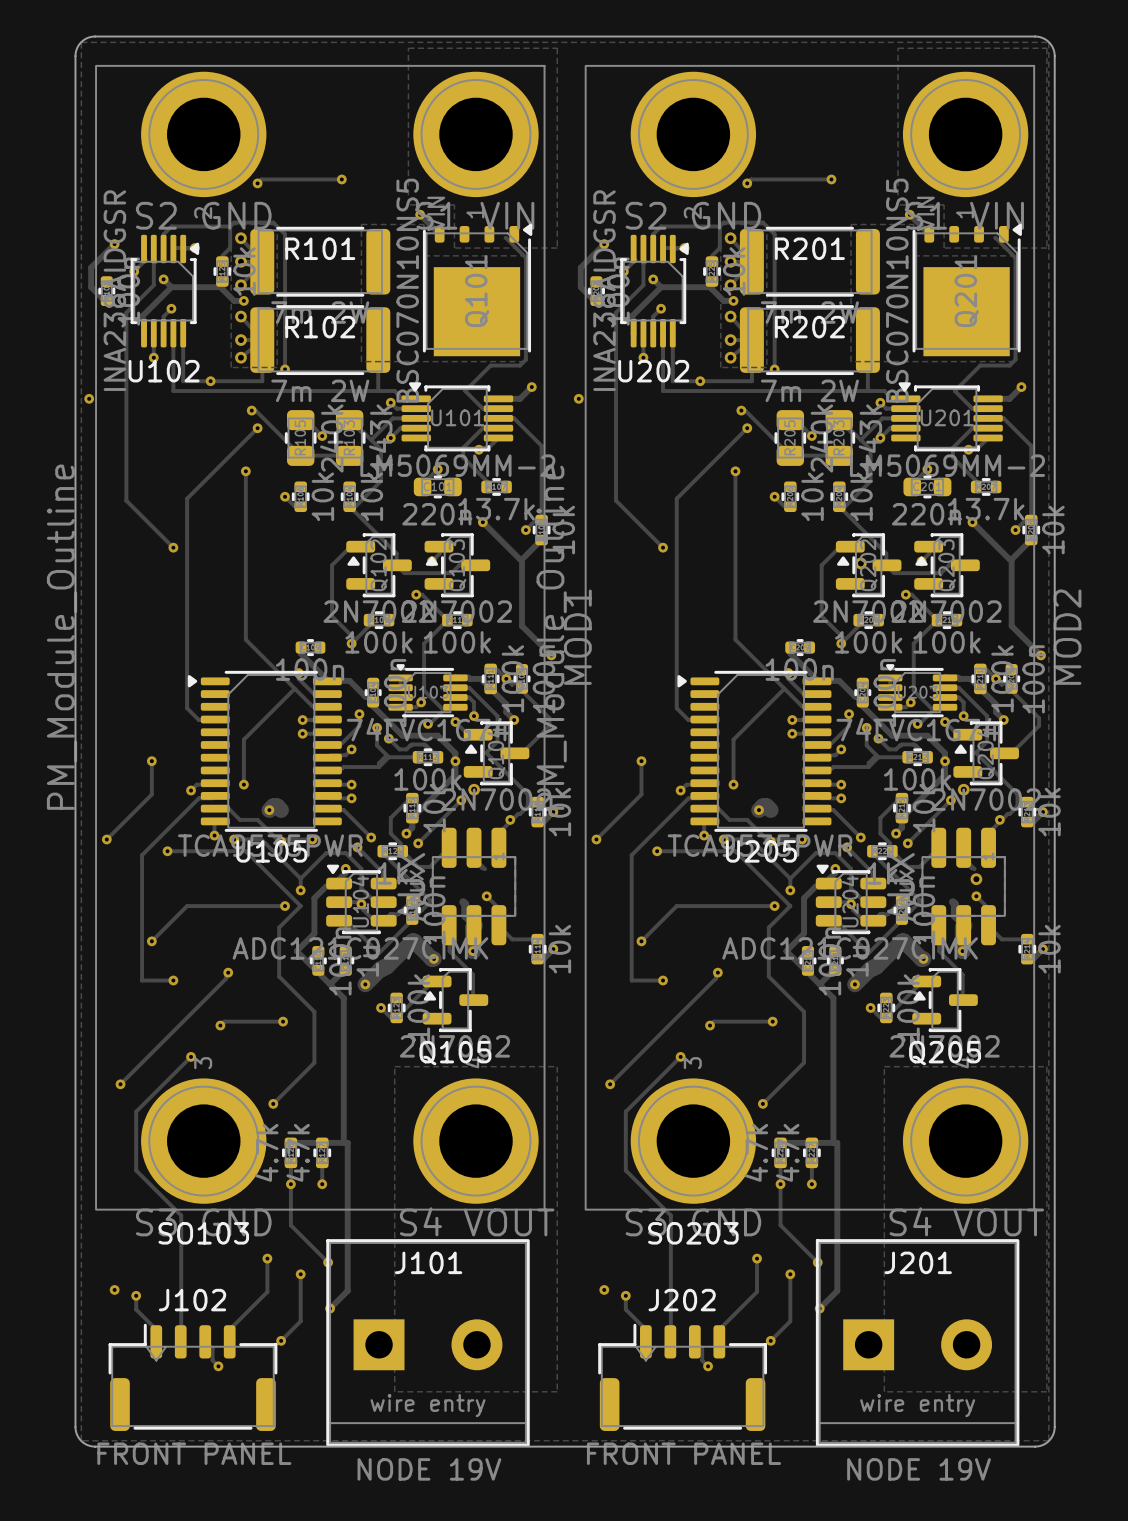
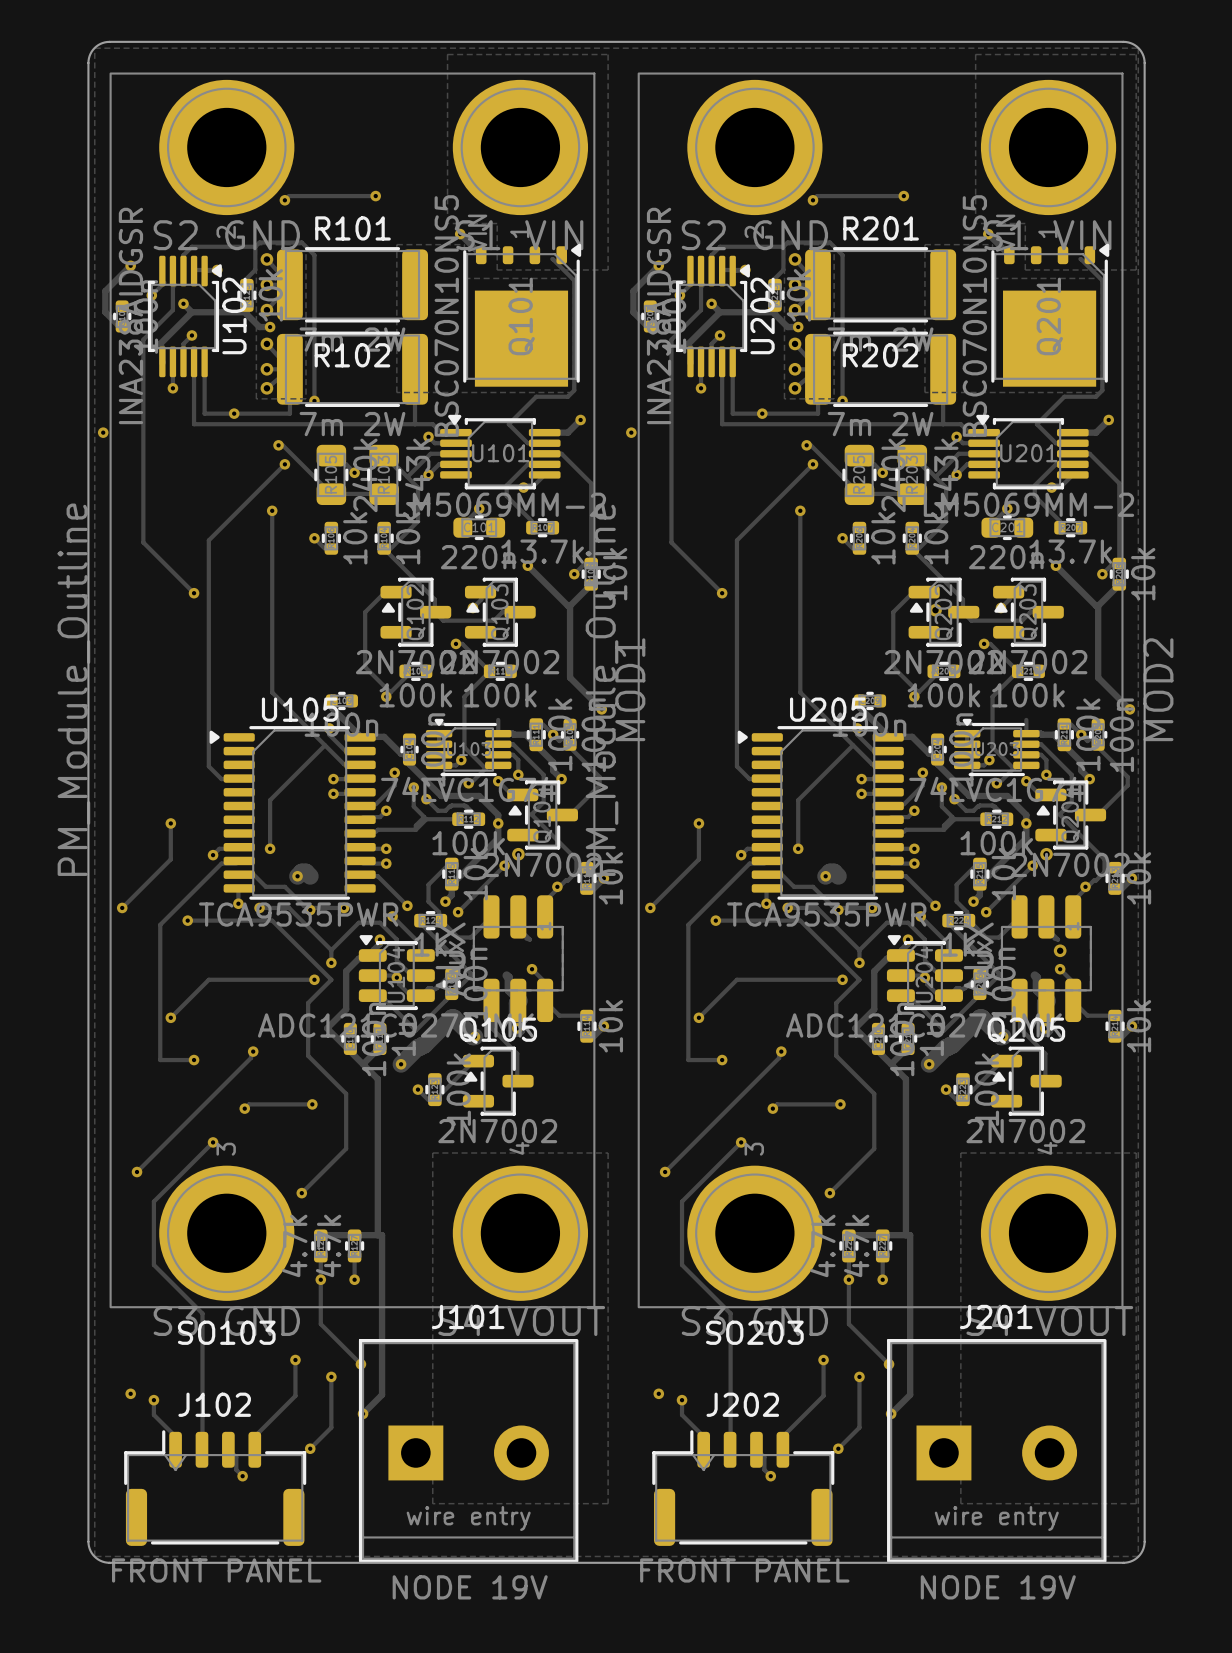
R101 name position: R101 (320, 248) -> R101 (352, 228)
R201 name position: R201 (809, 248) -> R201 (881, 228)
U102 name rotation: 0° (164, 371) -> 90° counterclockwise (234, 315)
U102 name position: U102 (164, 371) -> U102 (234, 315)
U202 name rotation: 0° (653, 371) -> 90° counterclockwise (762, 315)
U202 name position: U202 (653, 371) -> U202 (762, 315)
track: none -> (498, 719) (498, 732)
track: none -> (1026, 719) (1026, 732)
U105 name position: U105 (271, 851) -> U105 (300, 709)
U205 name position: U205 (761, 851) -> U205 (828, 709)
Q105 name position: Q105 (455, 1053) -> Q105 (498, 1030)
Q205 name position: Q205 (945, 1053) -> Q205 (1026, 1030)
J101 name position: J101 (428, 1262) -> J101 (468, 1316)
J201 name position: J201 (918, 1262) -> J201 (996, 1316)

